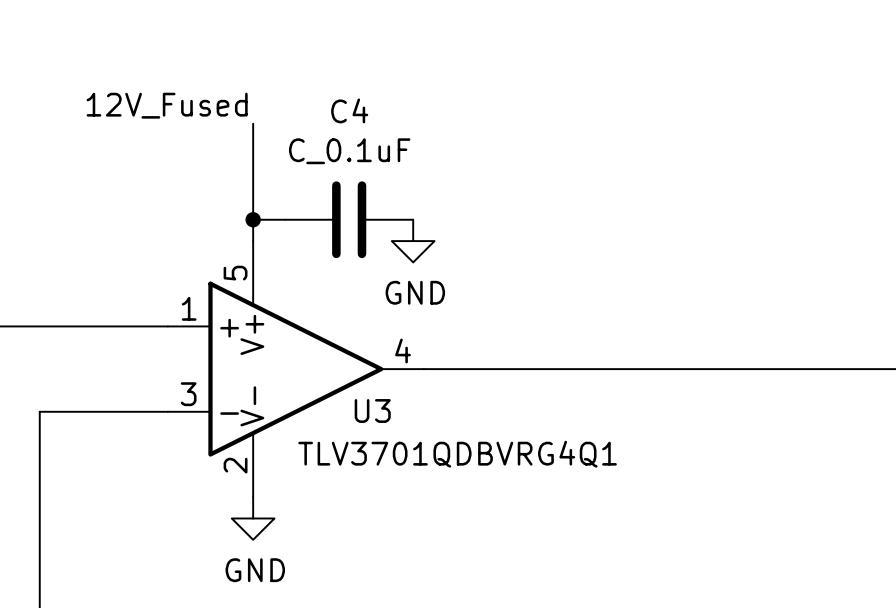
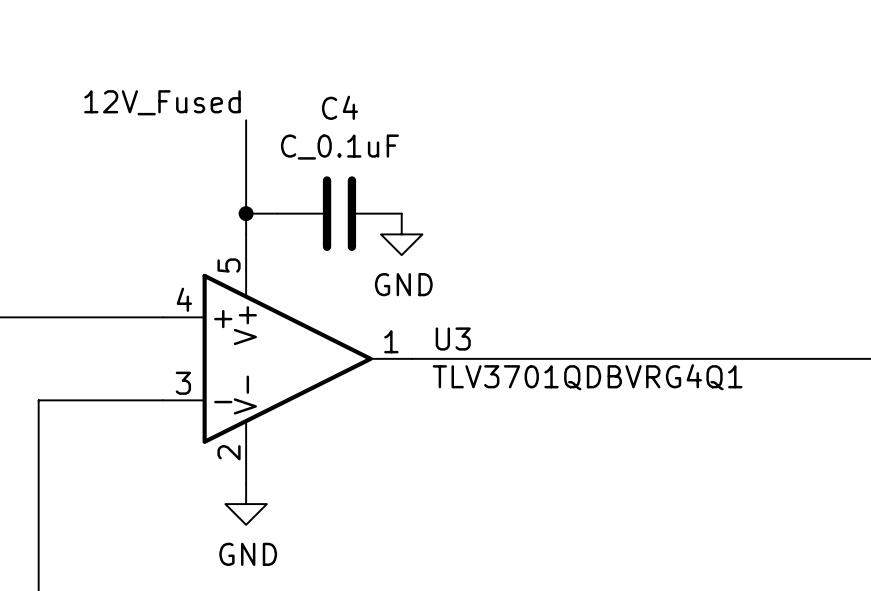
U3 pin number: 1 (189, 308) -> 4 (184, 299)
U3 pin number: 4 (403, 351) -> 1 (391, 341)
U3 name position: U3 (372, 410) -> U3 (453, 339)
U3 value position: TLV3701QDBVRG4Q1 (457, 454) -> TLV3701QDBVRG4Q1 (587, 377)

